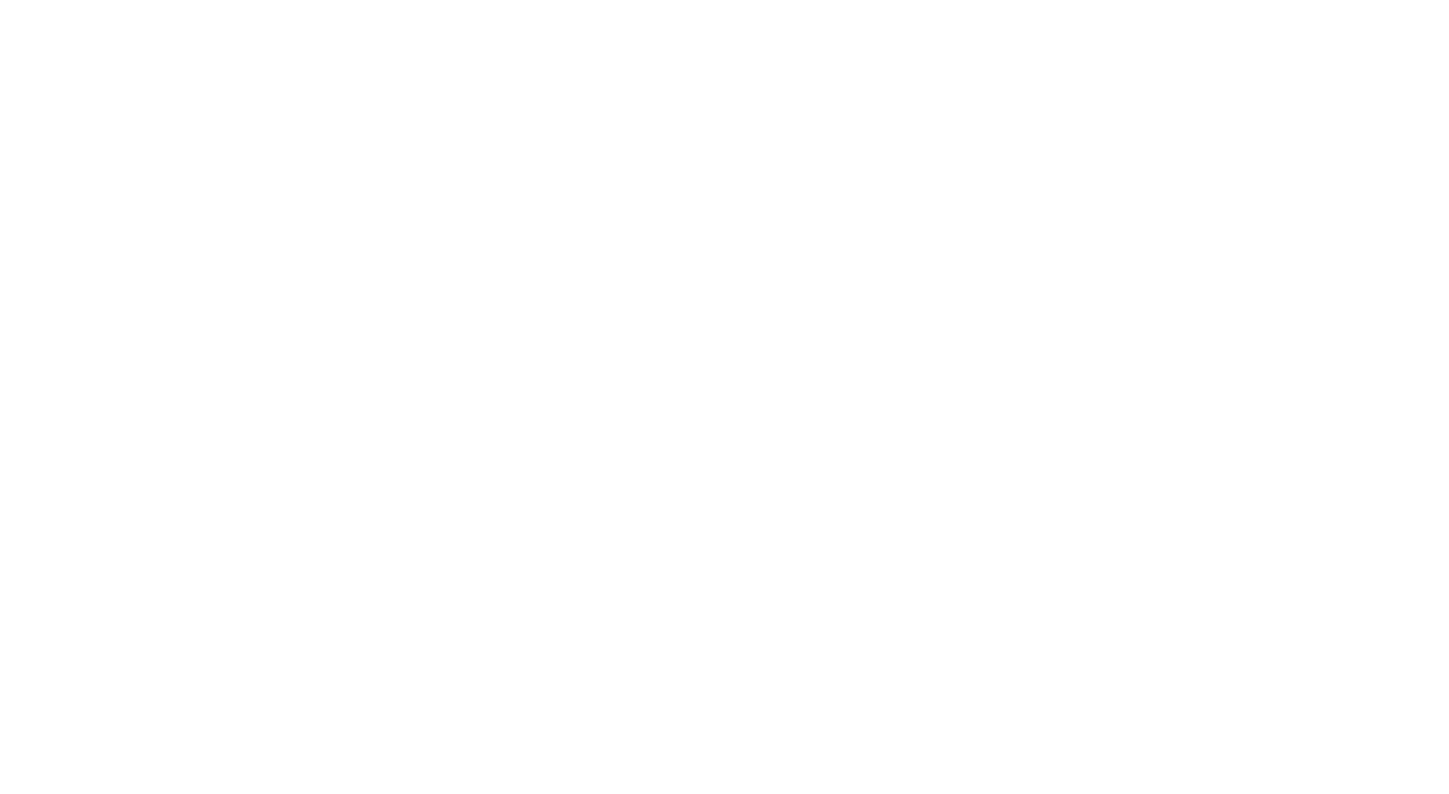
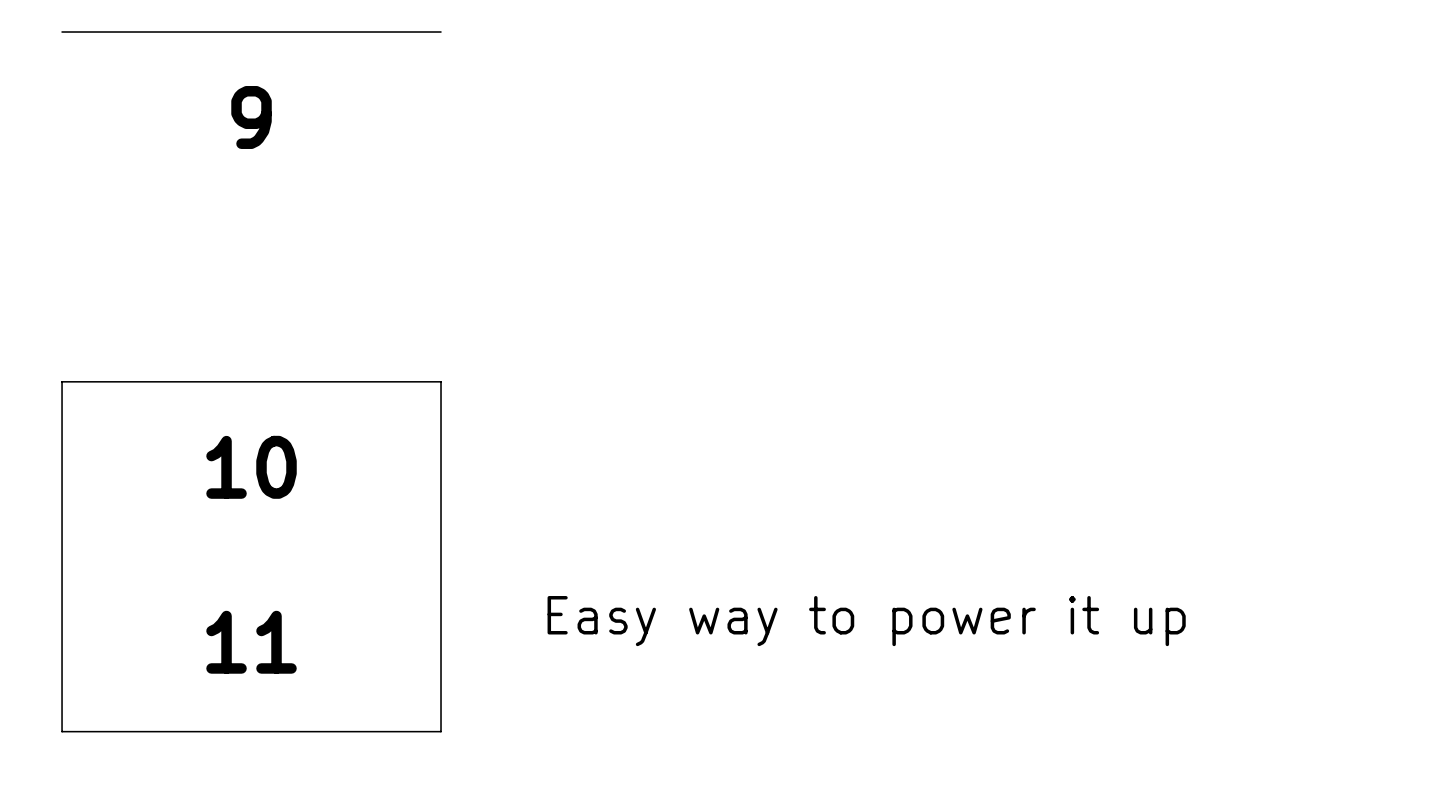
line: none -> (62, 32) (441, 32)
text: none -> 9 (251, 117)
line: none -> (62, 381) (441, 381) (441, 731) (62, 731) (62, 381)
text: none -> 10 (251, 467)
text: none -> Easy way to power it up (866, 621)
text: none -> 11 (251, 642)

